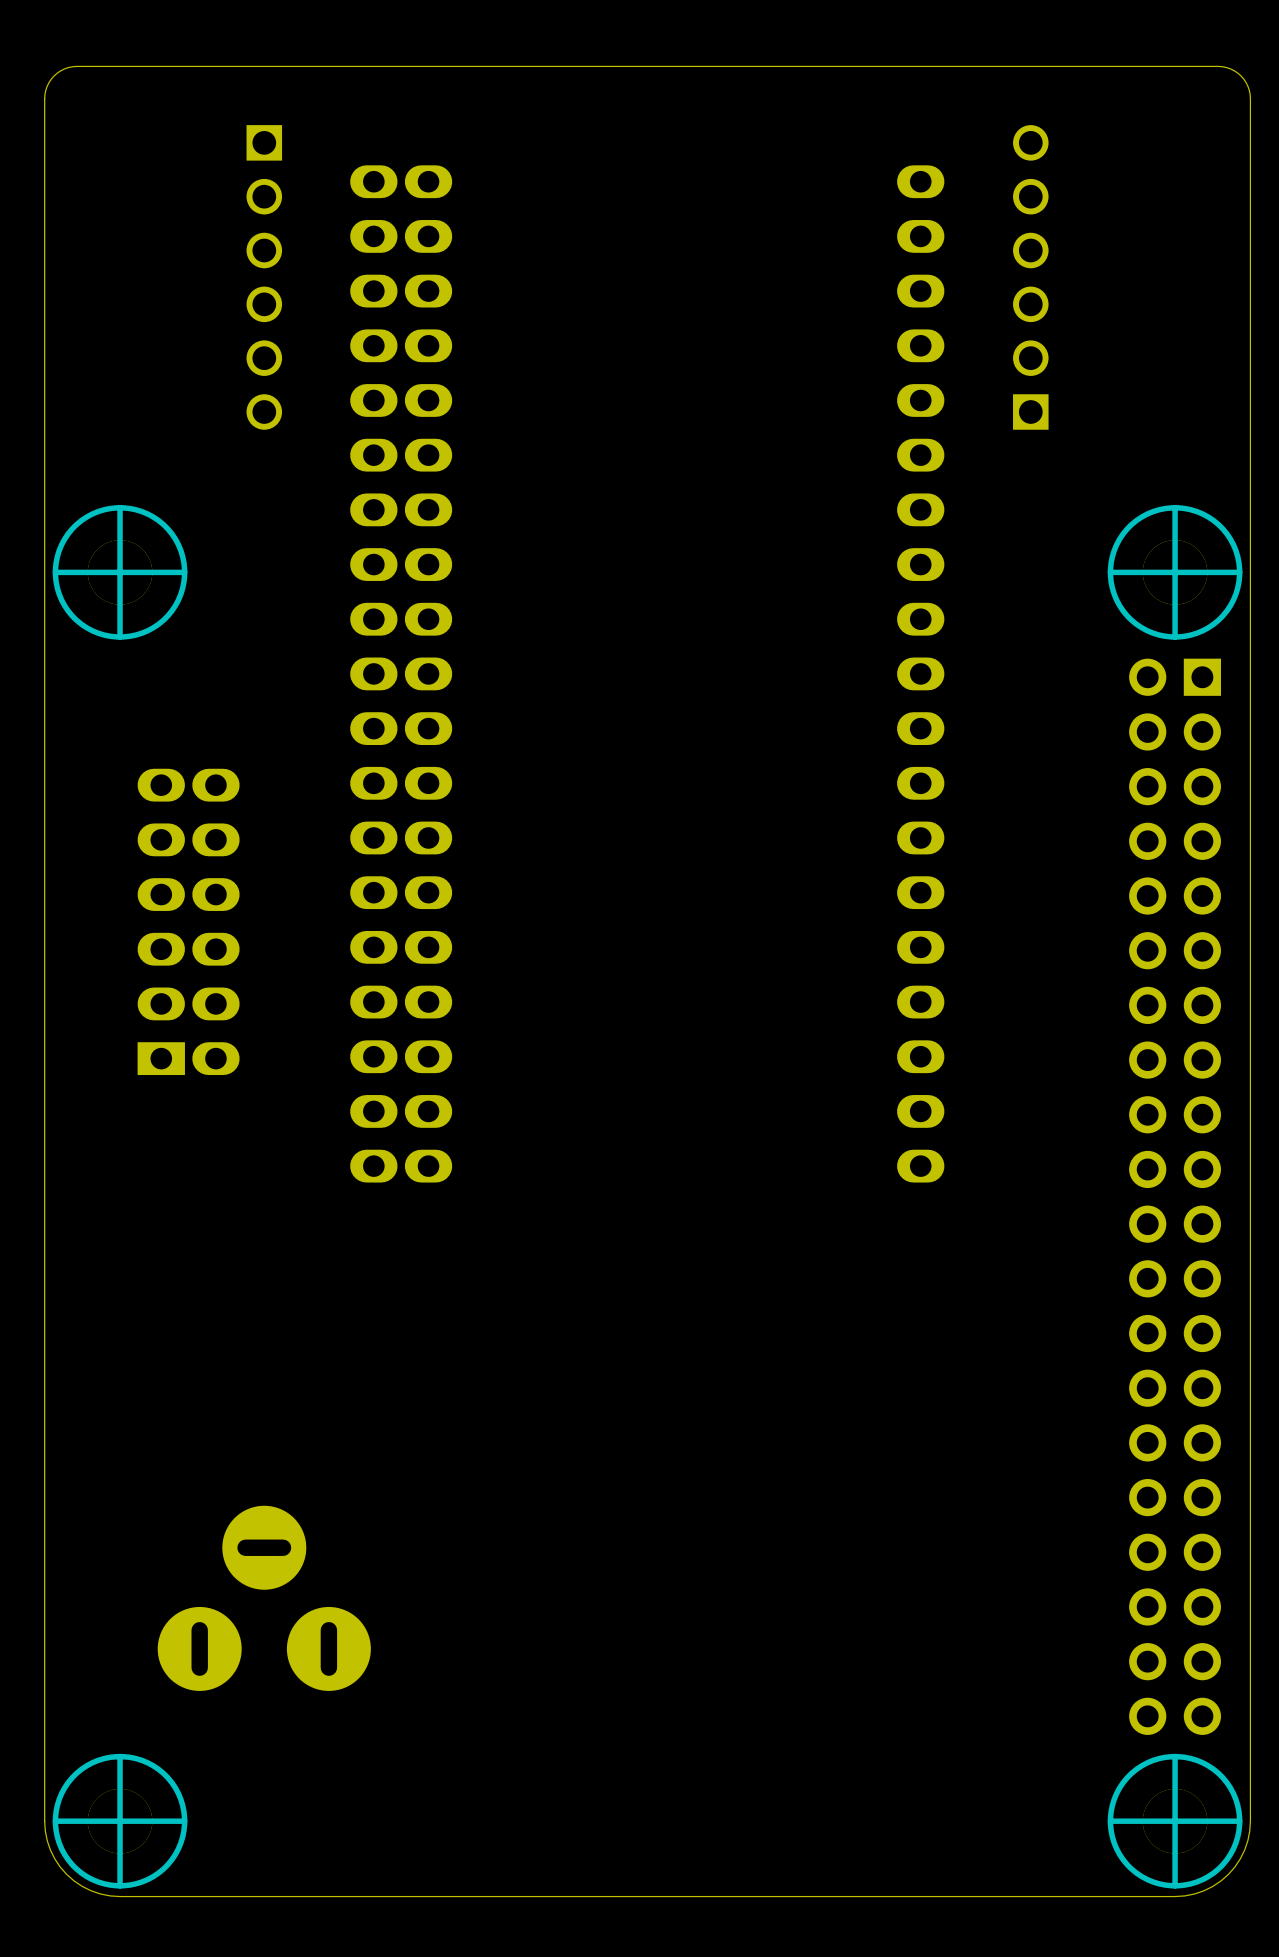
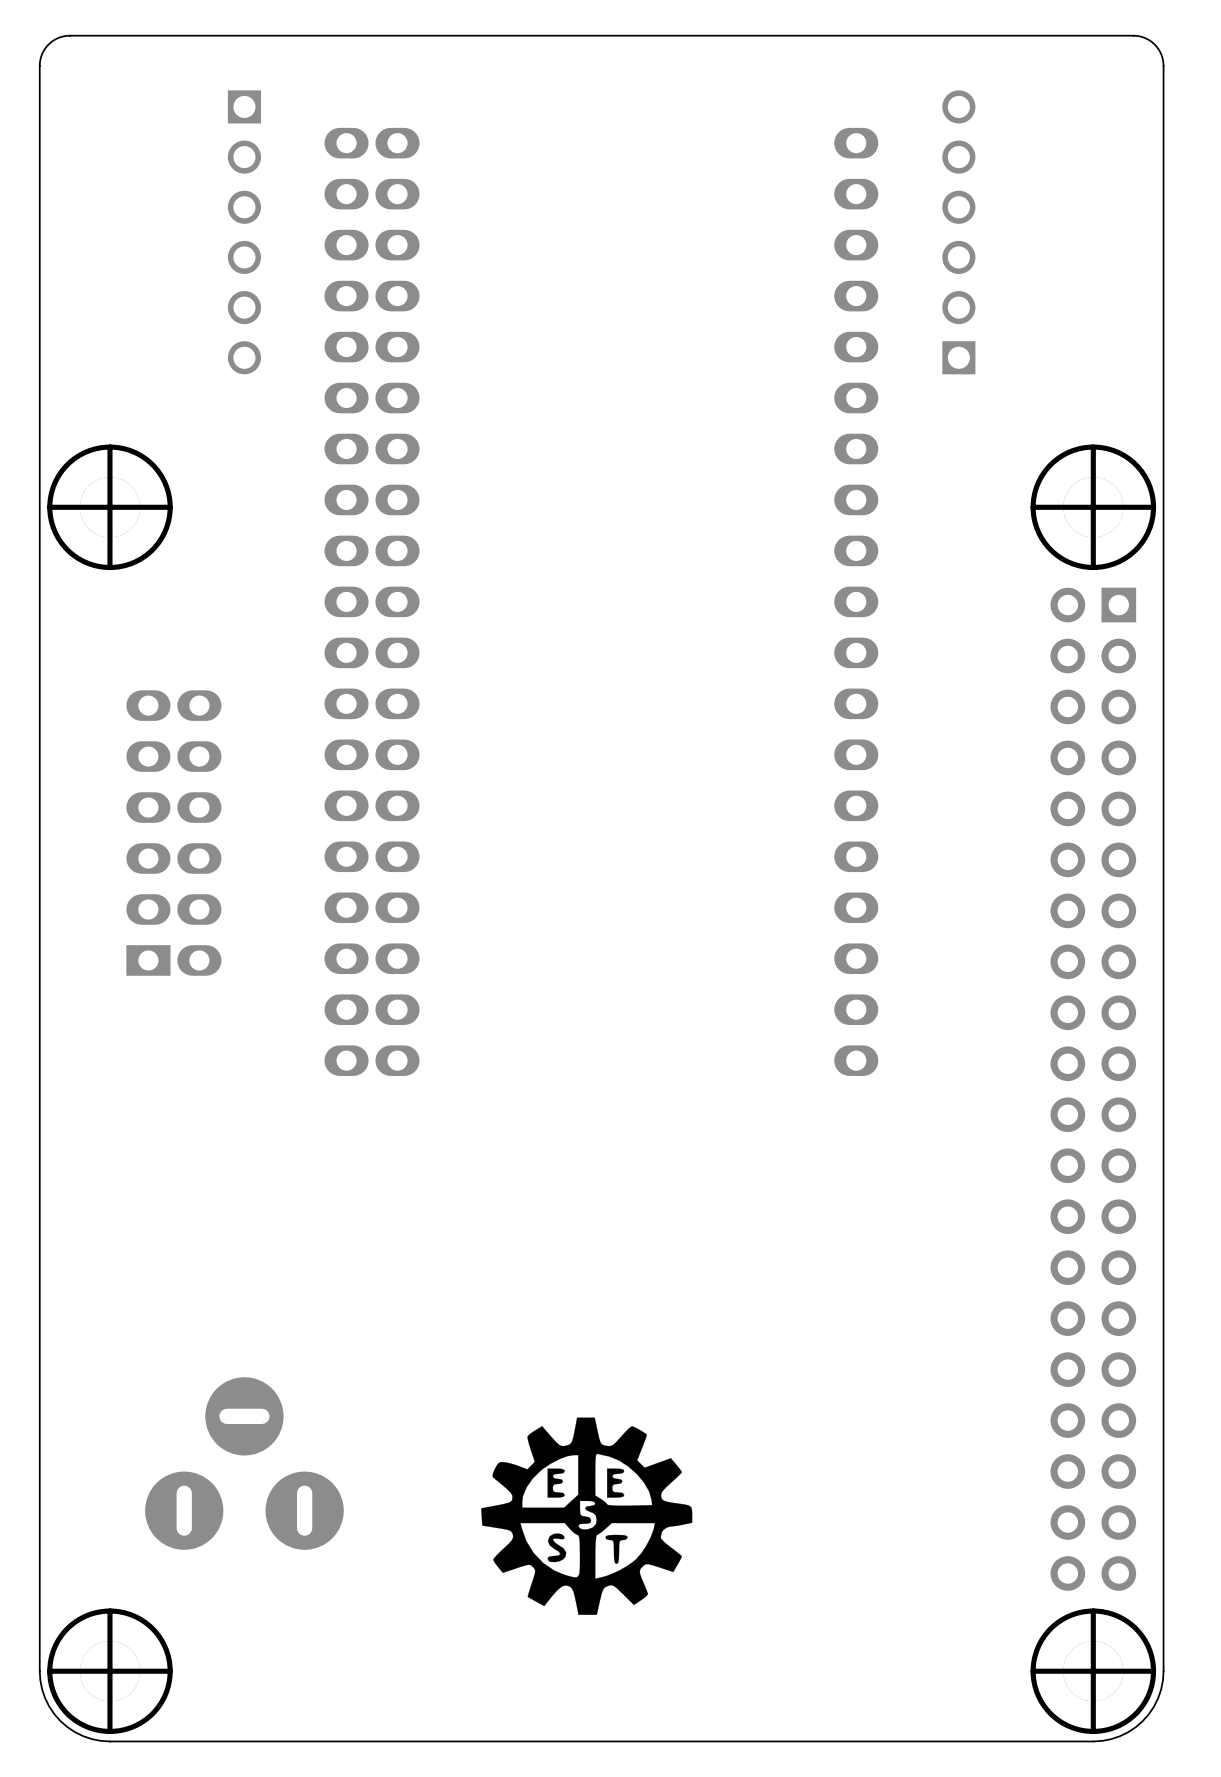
drawing: none -> [481, 1417, 693, 1615]

